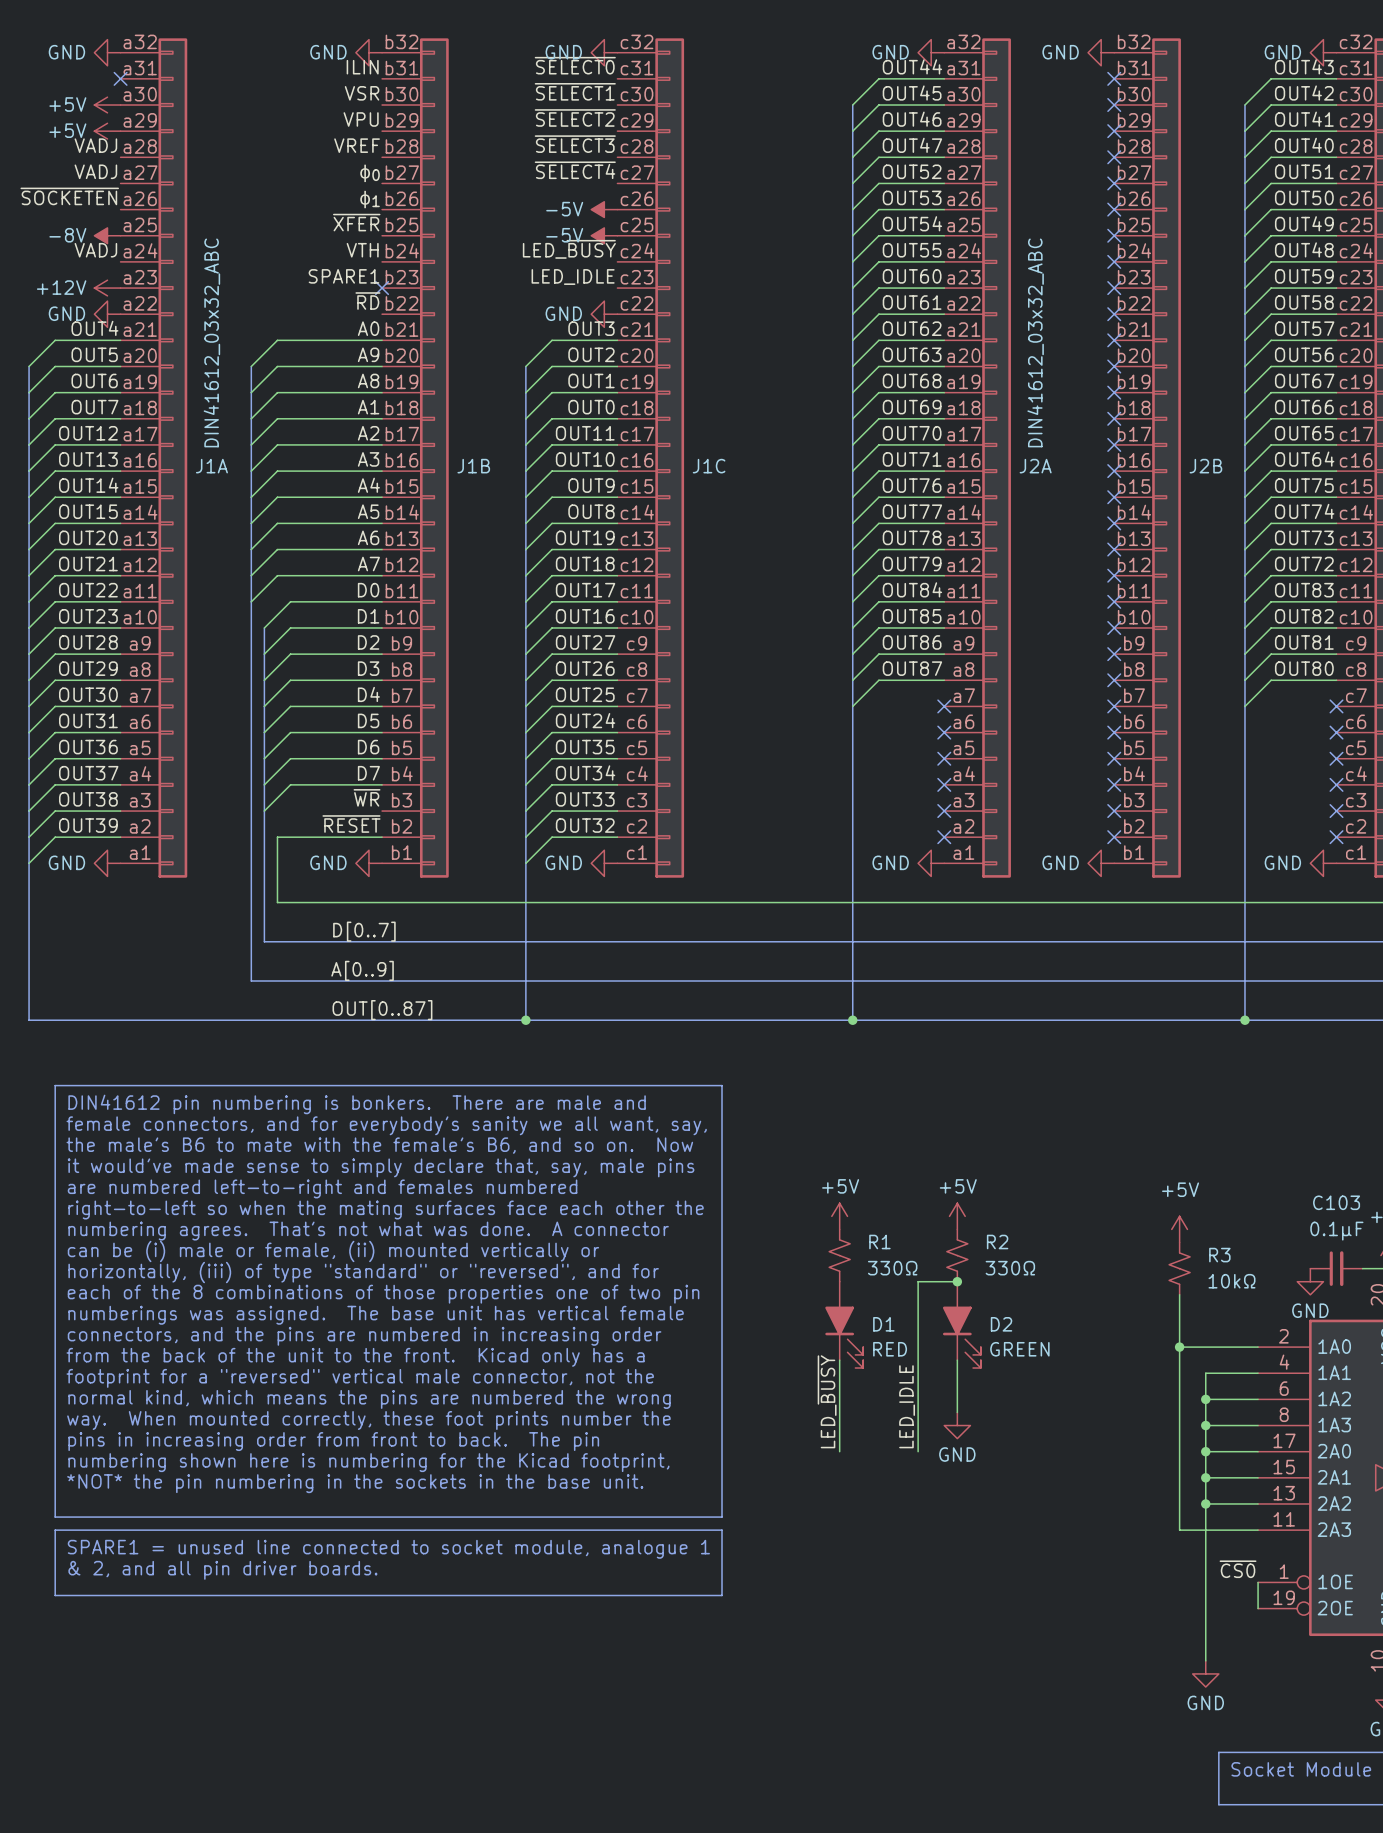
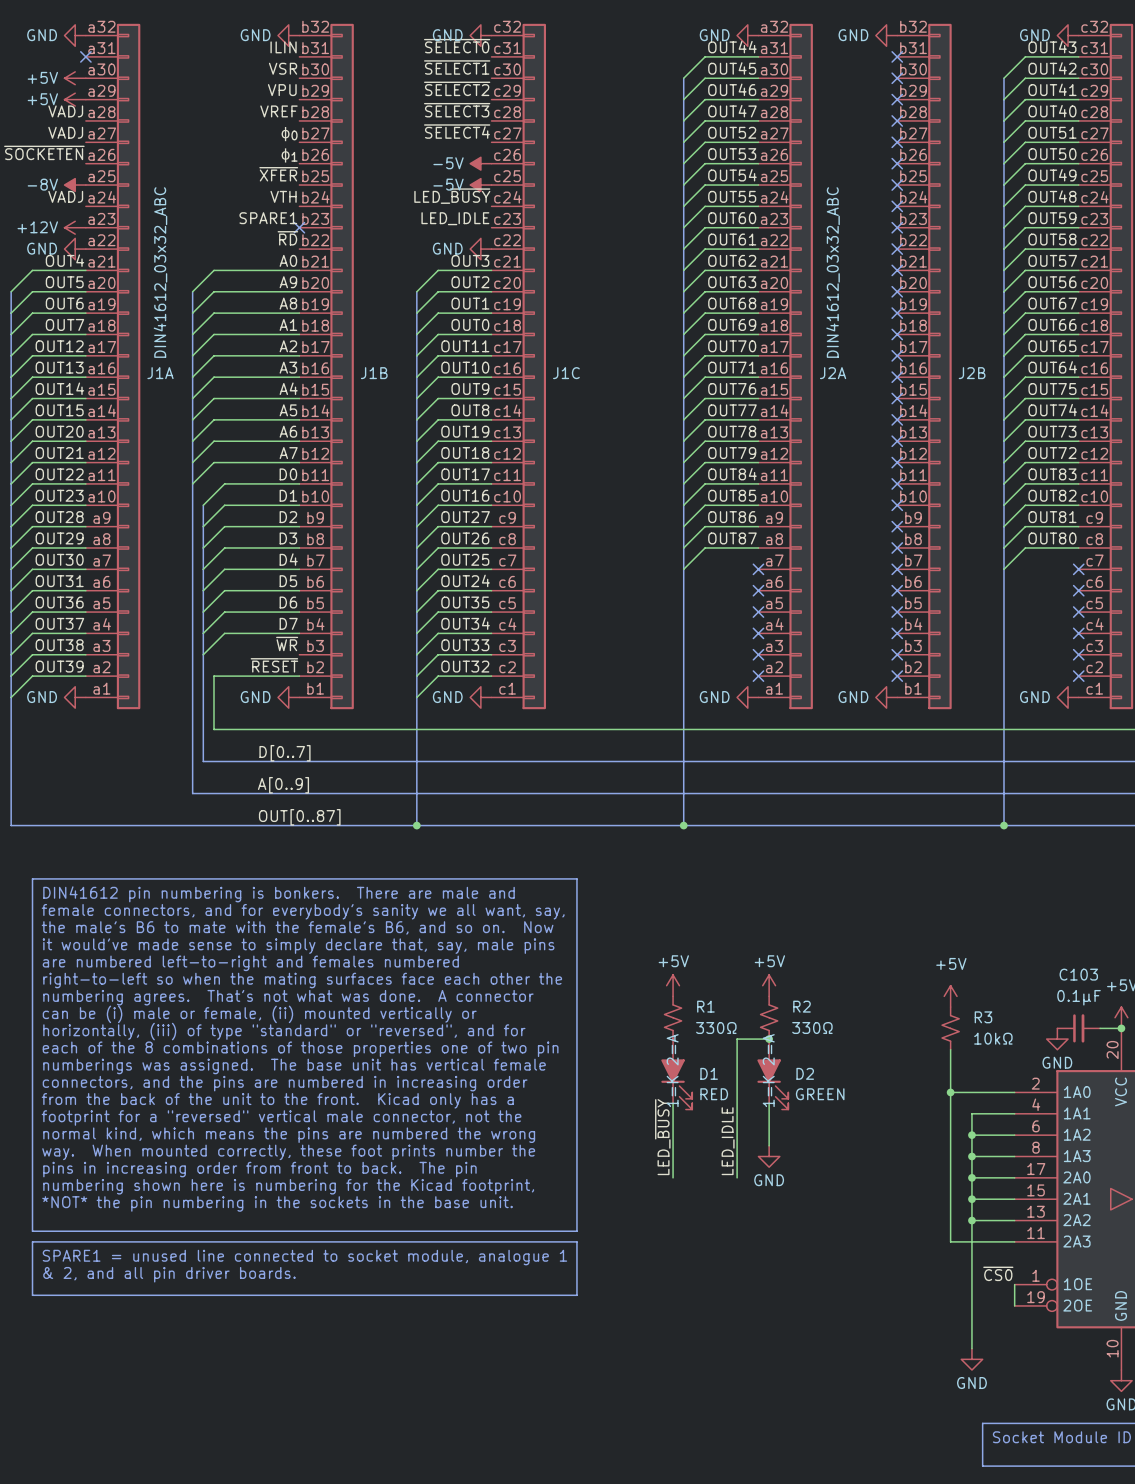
D1 text: none -> 1=K 2=A (672, 1070)
D2 text: none -> 1=K 2=A (768, 1070)

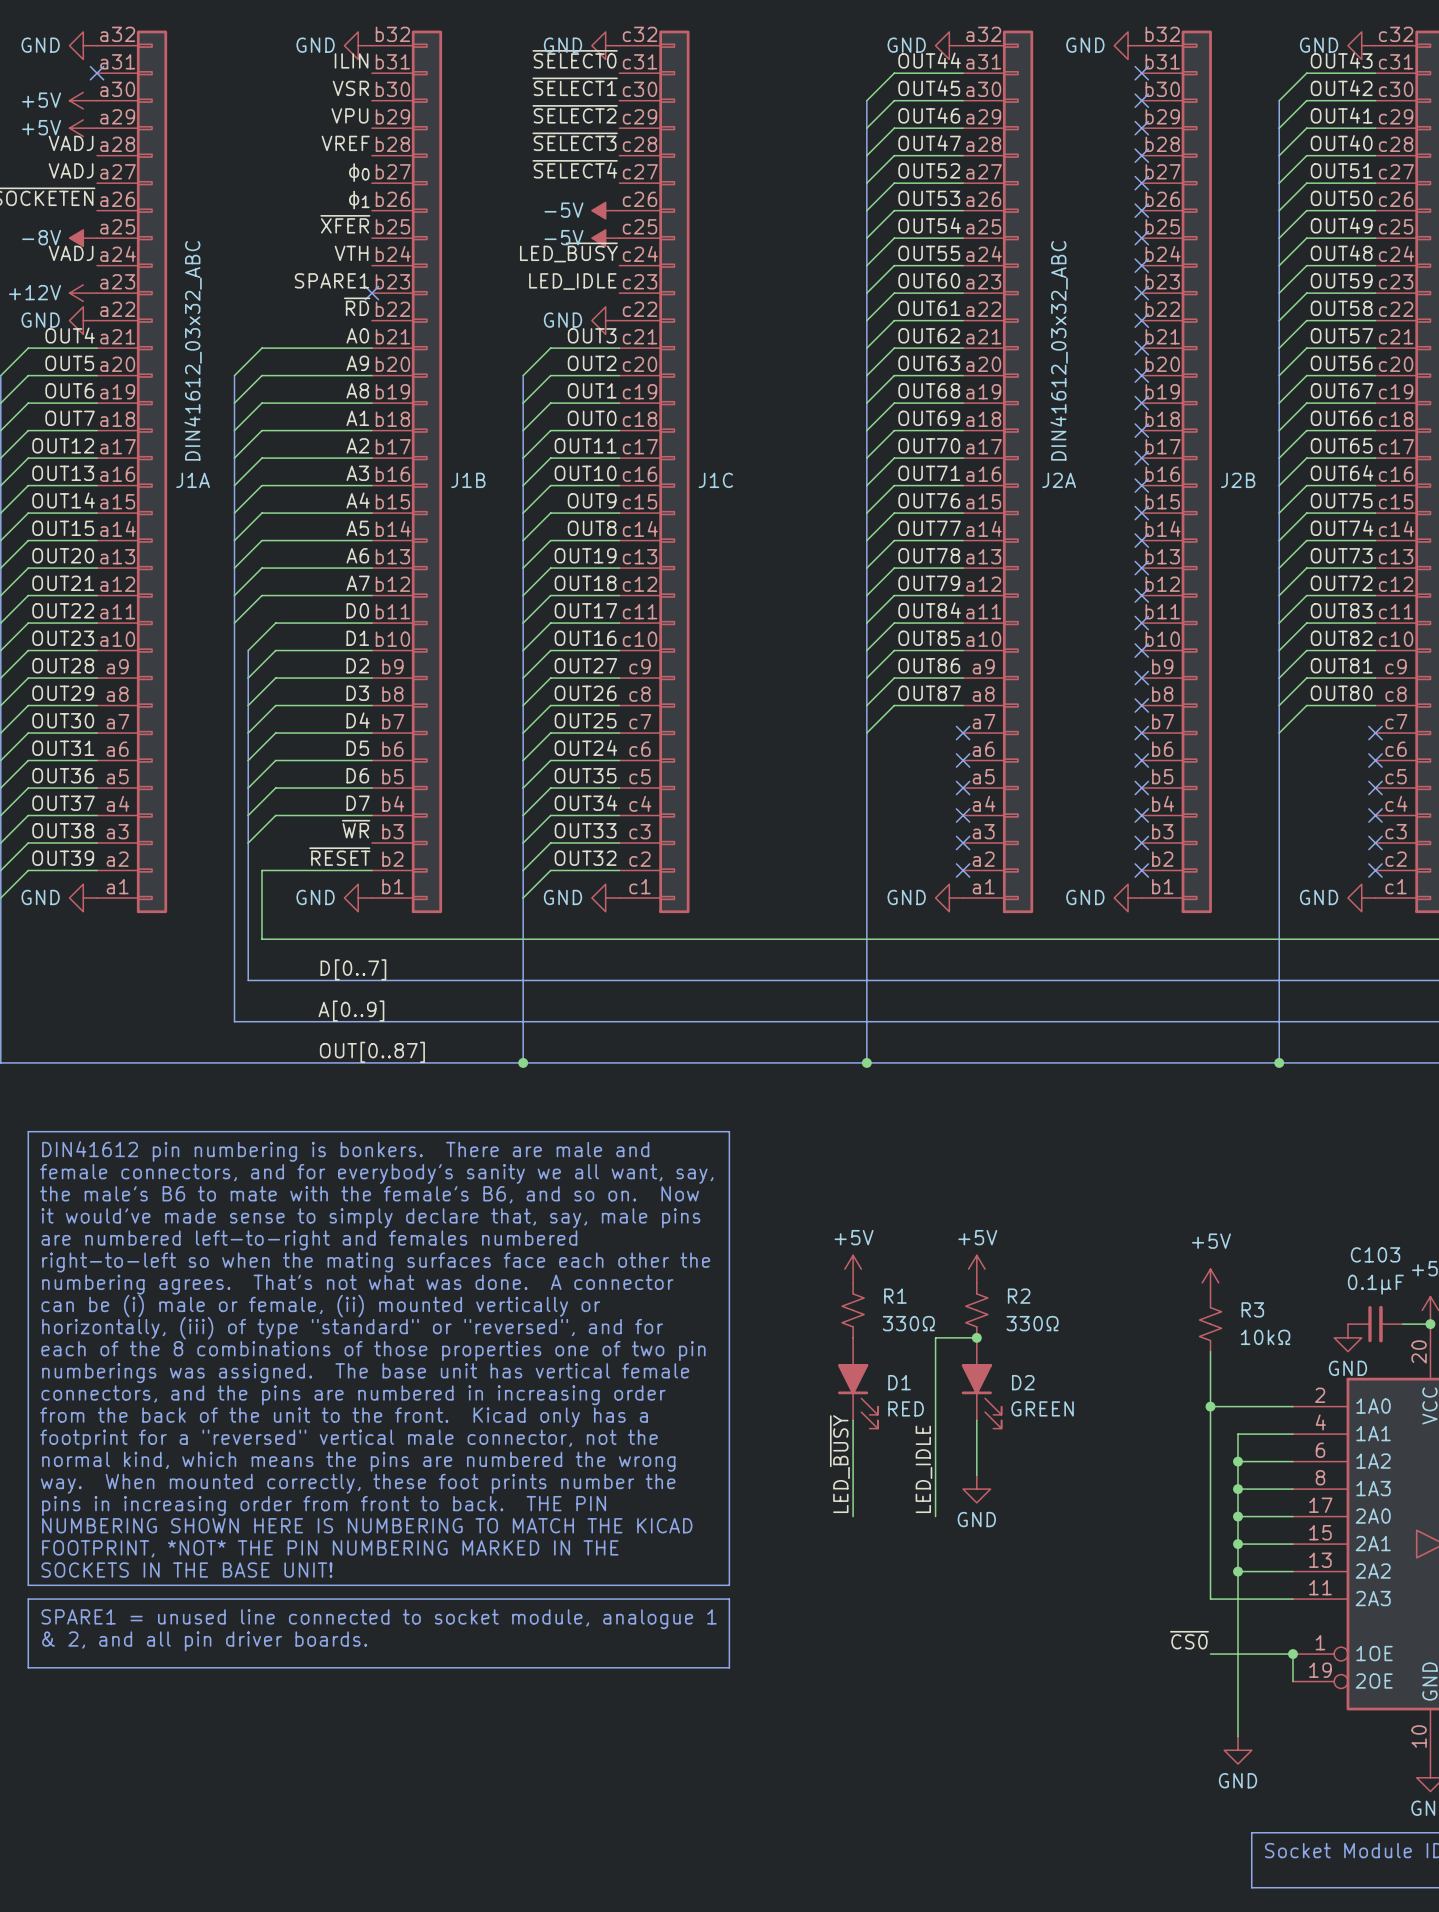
D1 text: 1=K 2=A (672, 1070) -> none
D2 text: 1=K 2=A (768, 1070) -> none
text: pins in increasing order from front to back. The pin (259, 1169) -> pins in increasing order from front to back. THE PIN (324, 1505)
text: numbering shown here is numbering for the Kicad footprint, (288, 1186) -> NUMBERING SHOWN HERE IS NUMBERING TO MATCH THE KICAD (367, 1525)
text: *NOT* the pin numbering in the sockets in the base unit. (277, 1203) -> FOOTPRINT, *NOT* THE PIN NUMBERING MARKED IN THE (330, 1548)
text: none -> SOCKETS IN THE BASE UNIT! (186, 1570)
label position: ~{CS0} (998, 1273) -> ~{CS0} (1189, 1640)
wire: none -> (1210, 1654) (1292, 1654)
junction: none -> (1292, 1654)

